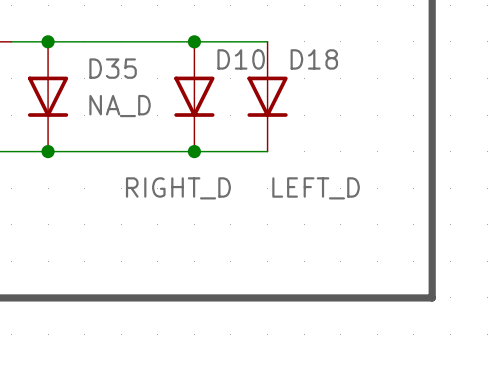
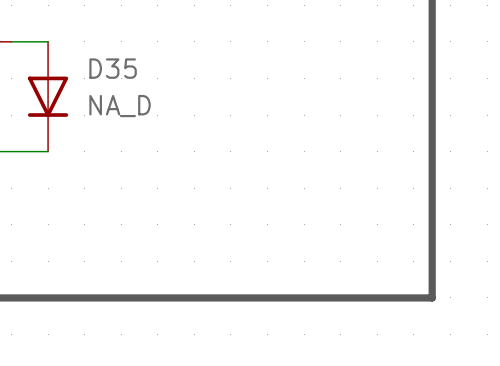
wire: (48, 41) (267, 41) -> none
junction: (48, 41) -> none
junction: (194, 41) -> none
D10: RIGHT_D (194, 96) -> none
D18: LEFT_D (267, 96) -> none
wire: (48, 151) (267, 151) -> none
junction: (48, 151) -> none
junction: (194, 151) -> none

